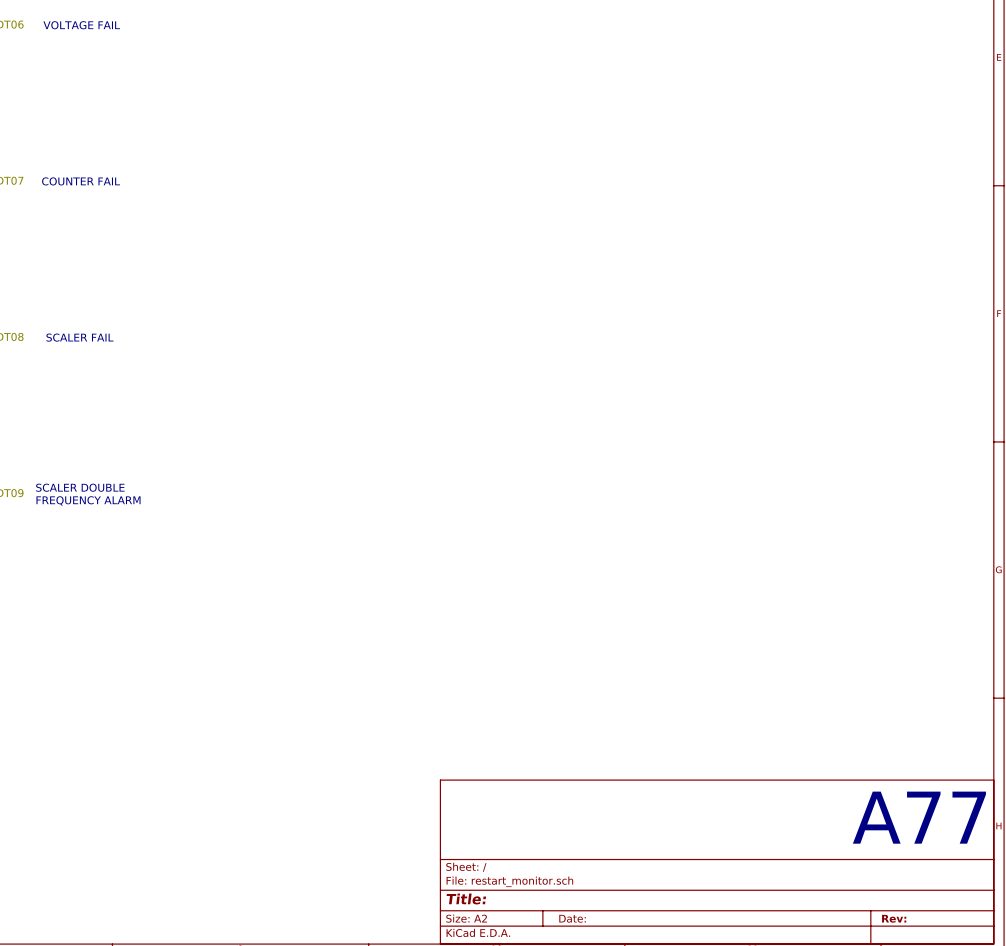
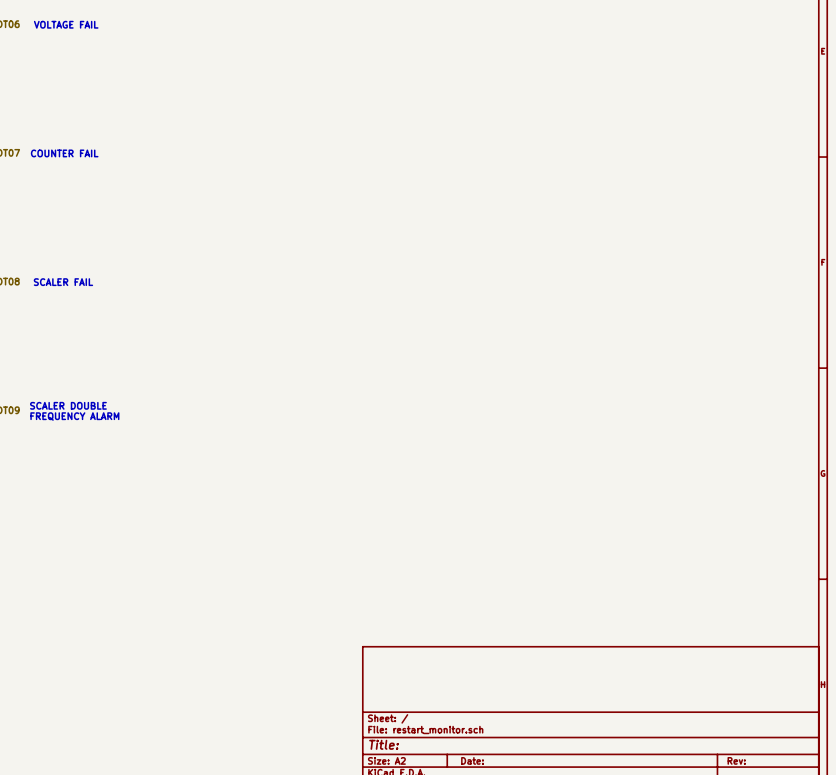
text: A77 (919, 817) -> none

